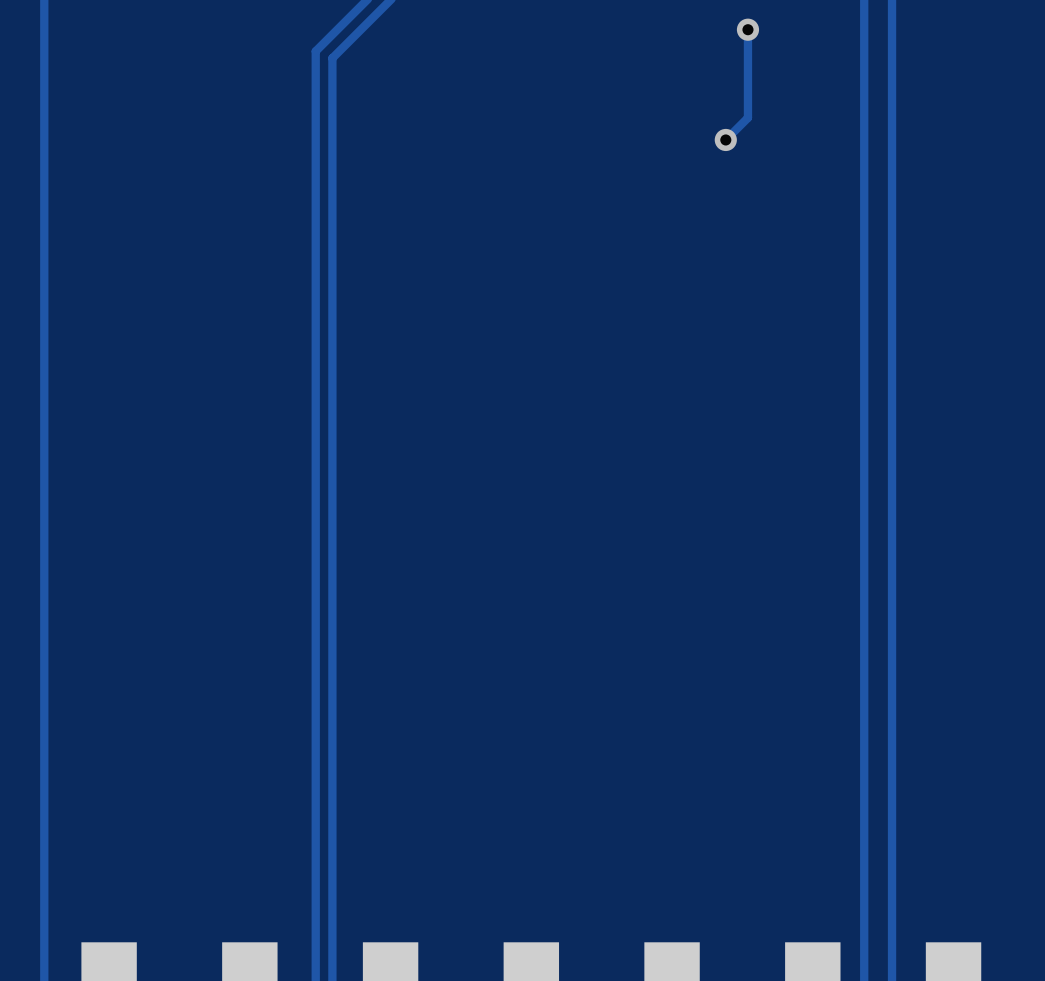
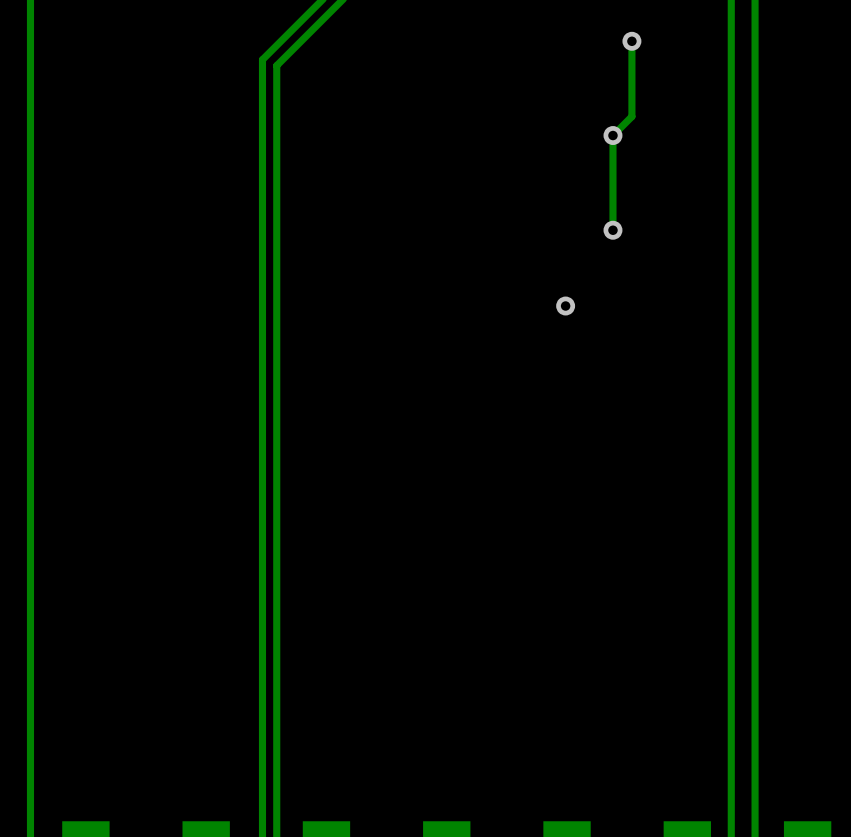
track: none -> (612, 135) (612, 230)
via: none -> (612, 230)
via: none -> (565, 306)

